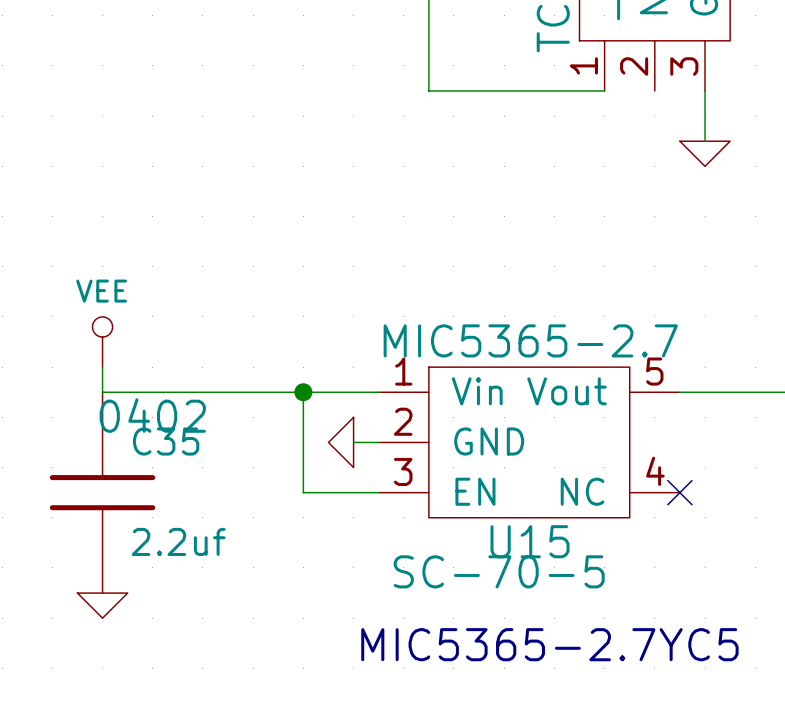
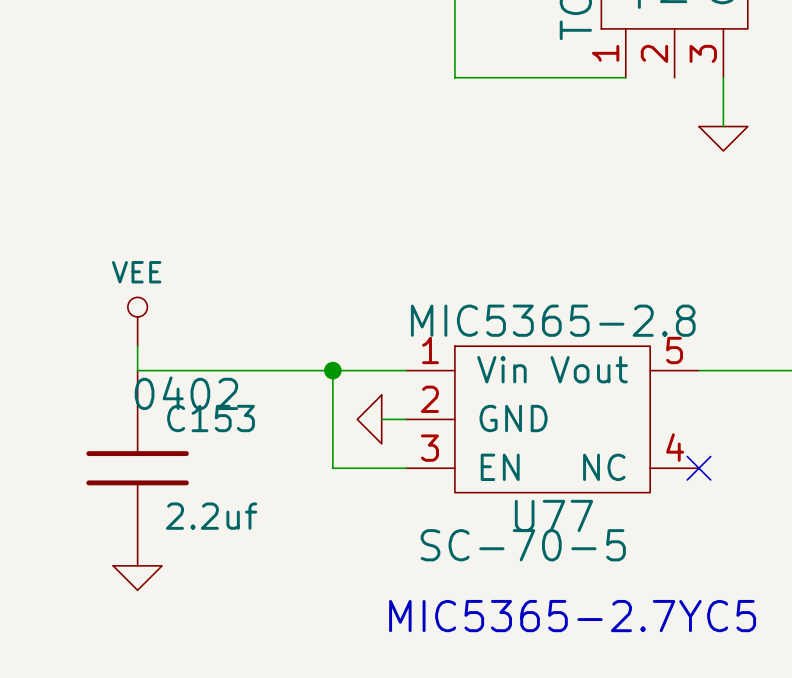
U15 value: MIC5365-2.7 (530, 340) -> MIC5365-2.8 (553, 320)
C35 name: C35 (166, 441) -> C153 (211, 418)
U15 name: U15 (530, 541) -> U77 (553, 515)

